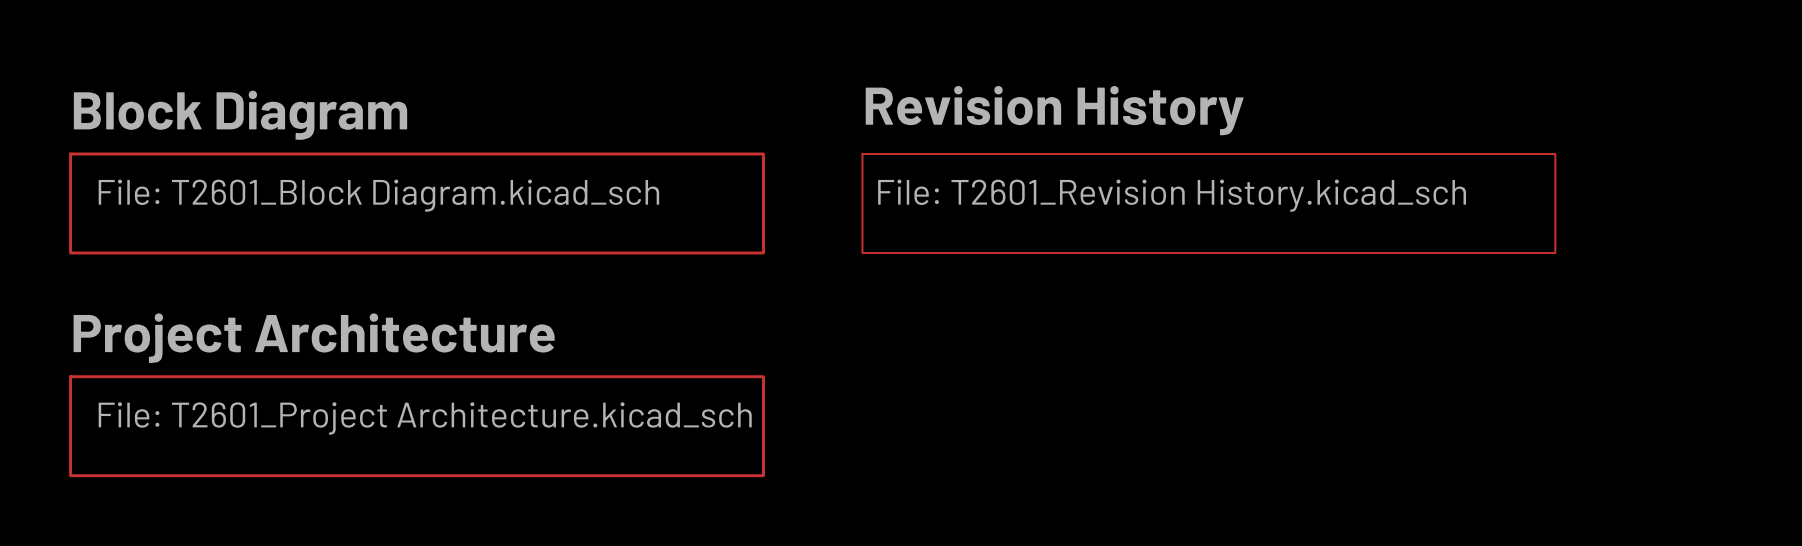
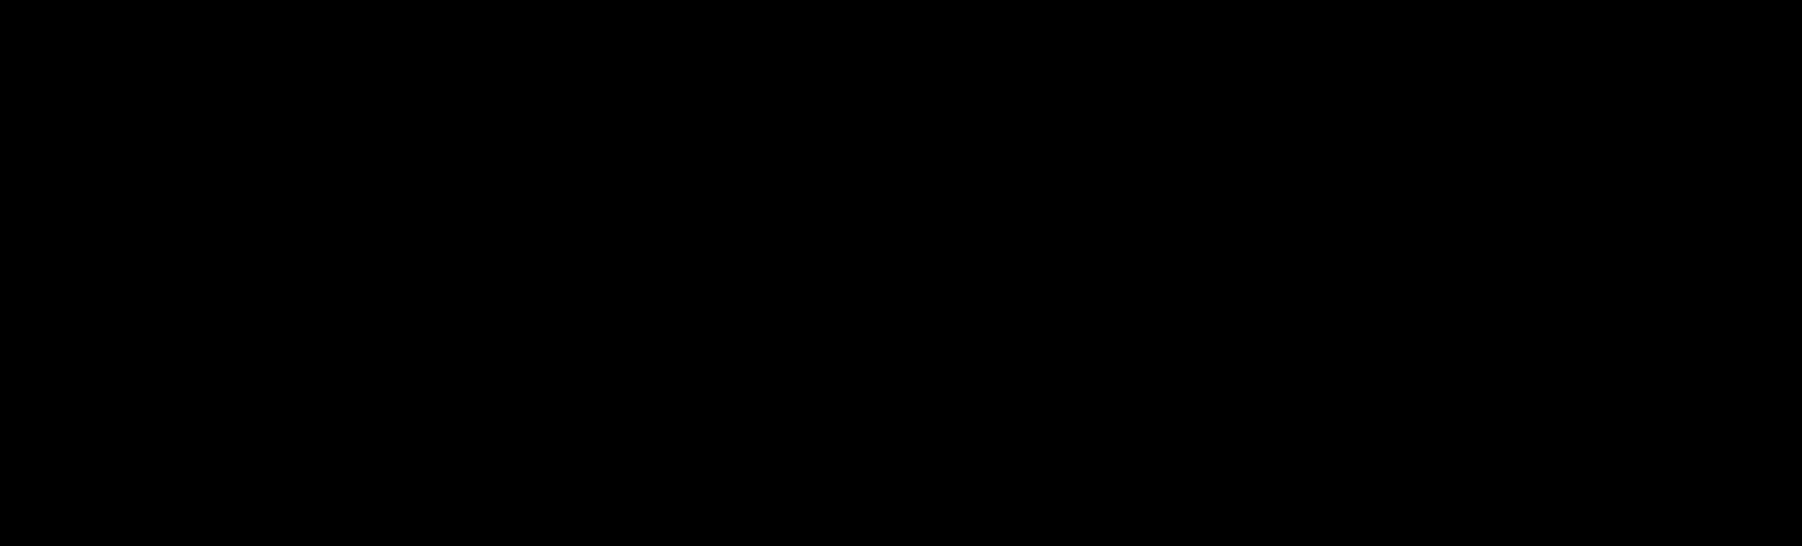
sheet Block Diagram: File: T2601_Block Diagram.kicad_sch (417, 203) -> none
sheet Revision History: File: T2601_Revision History.kicad_sch (1208, 203) -> none
sheet Project Architecture: File: T2601_Project Architecture.kicad_sch (417, 426) -> none

